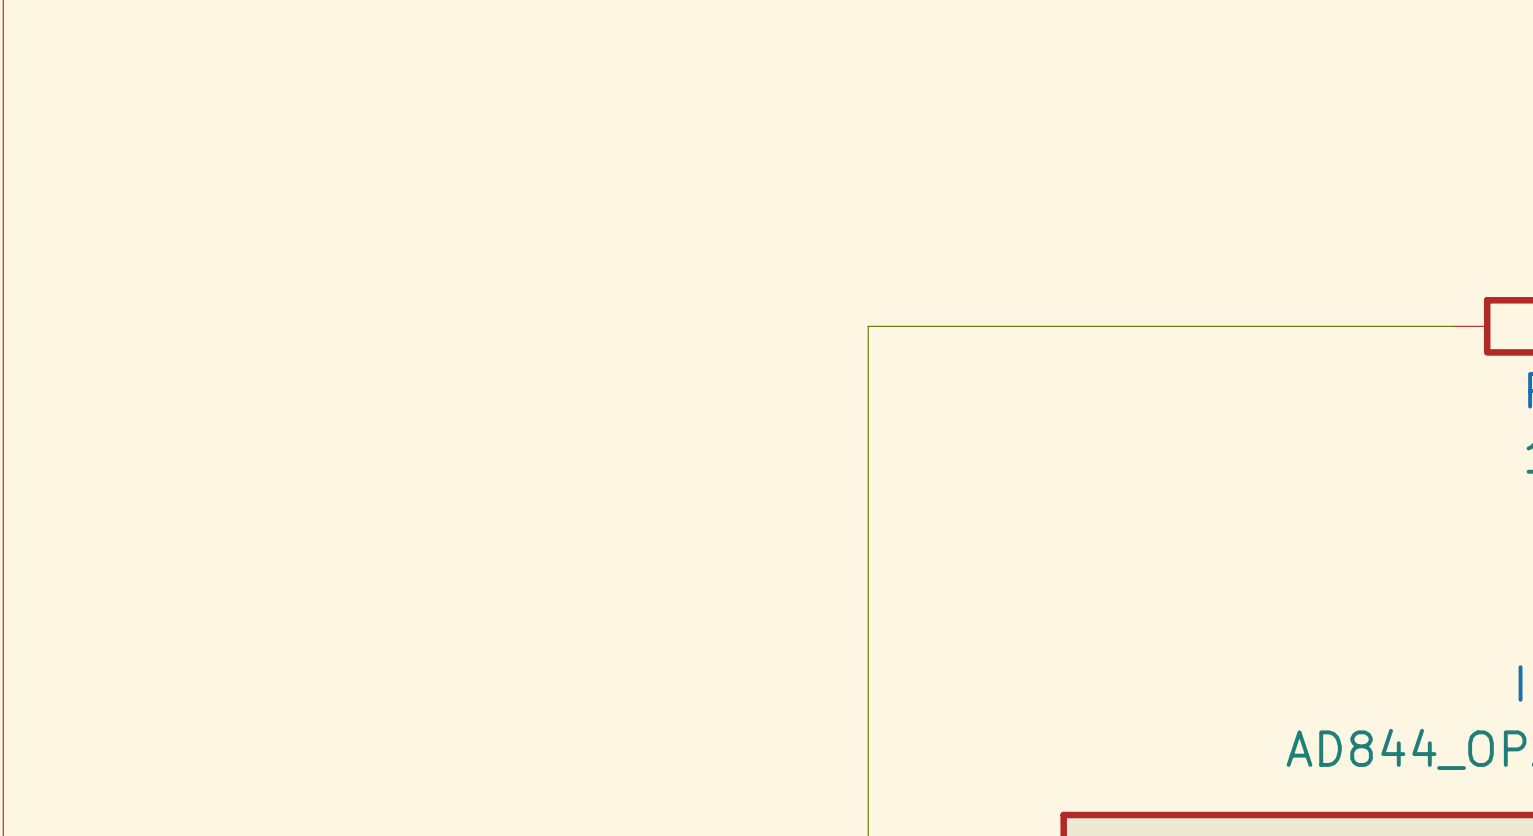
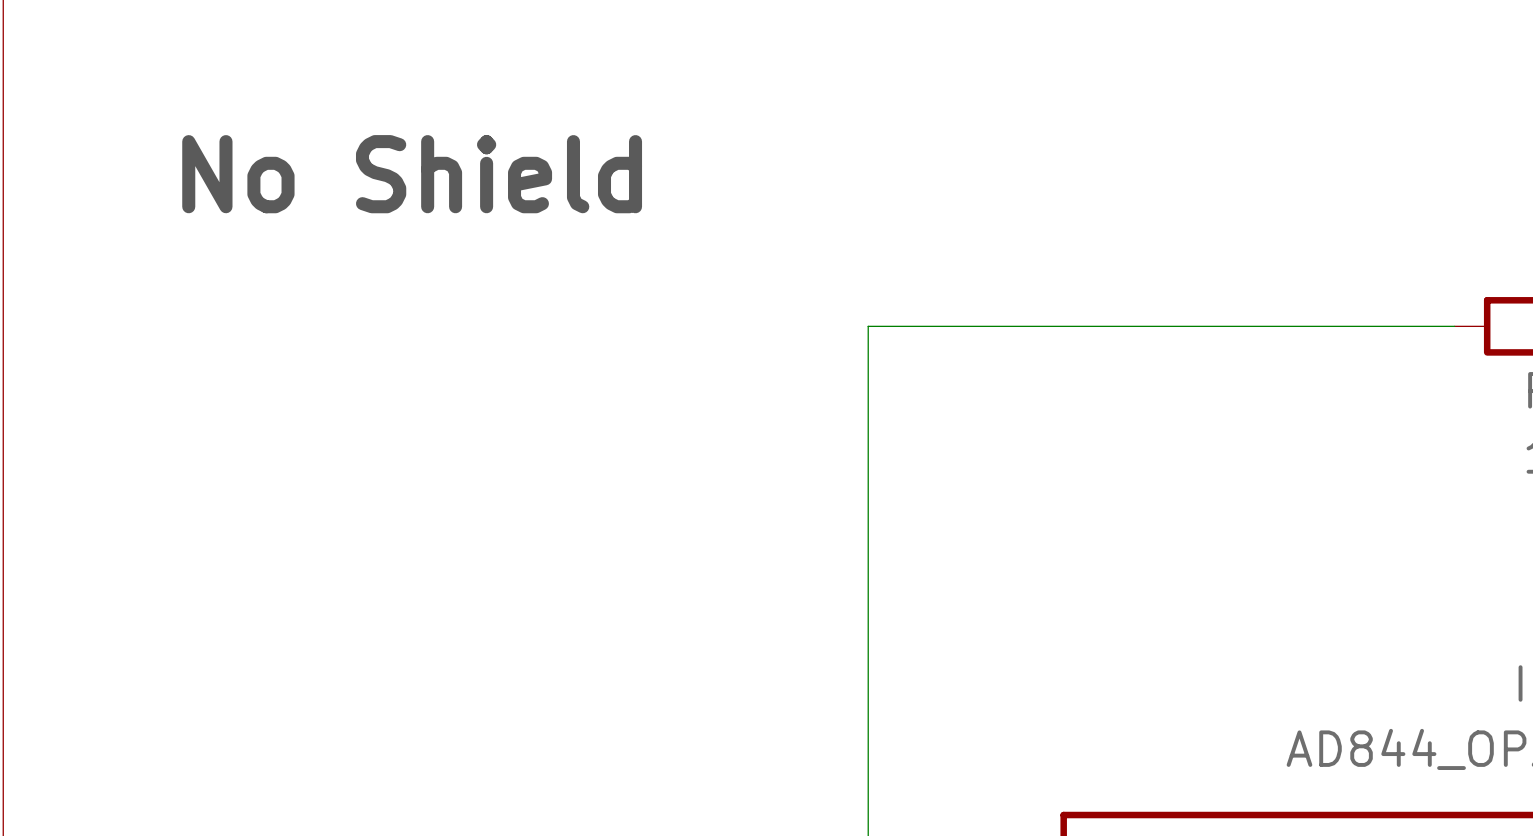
text: none -> No Shield (412, 174)

